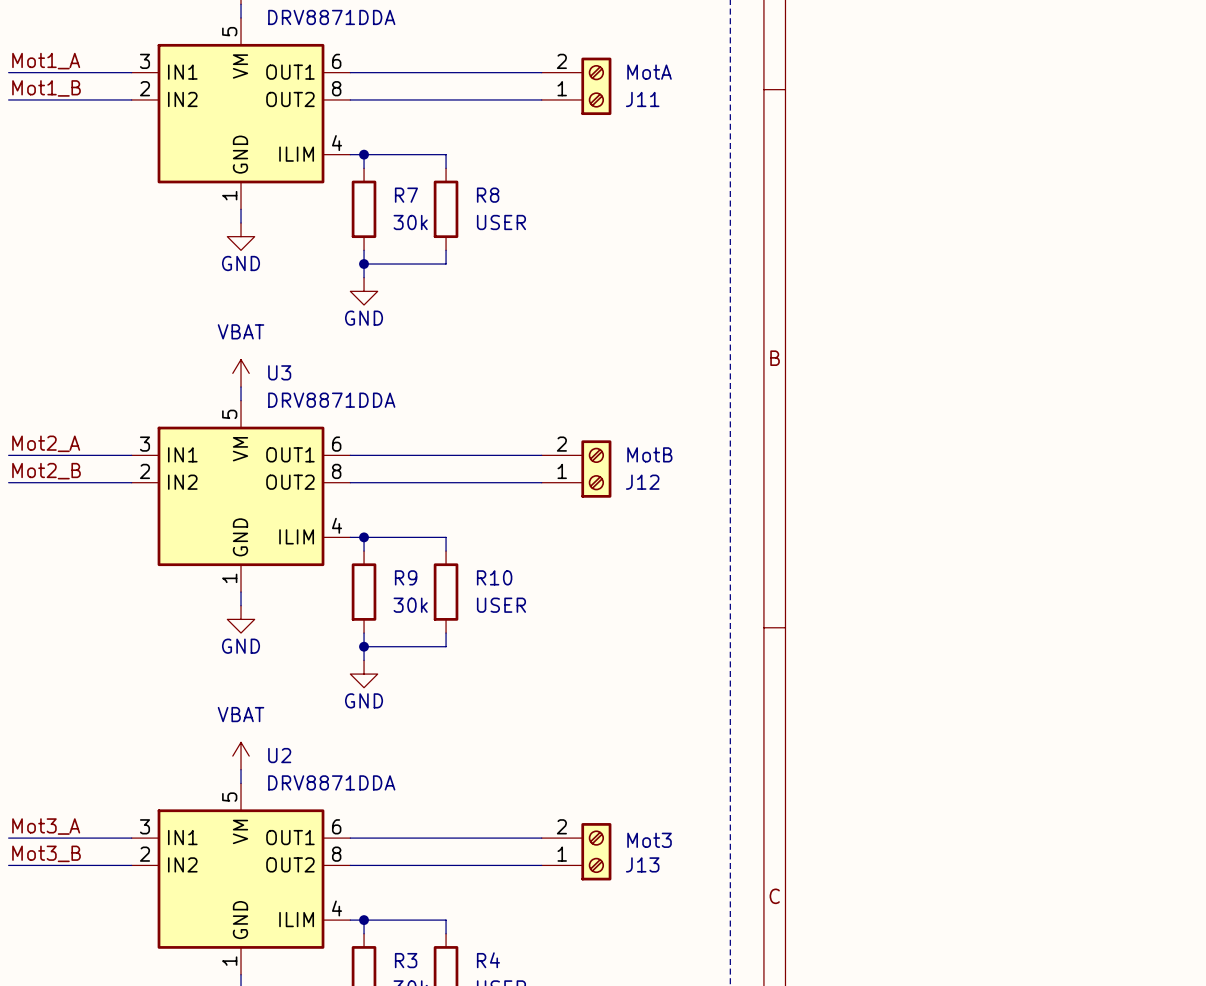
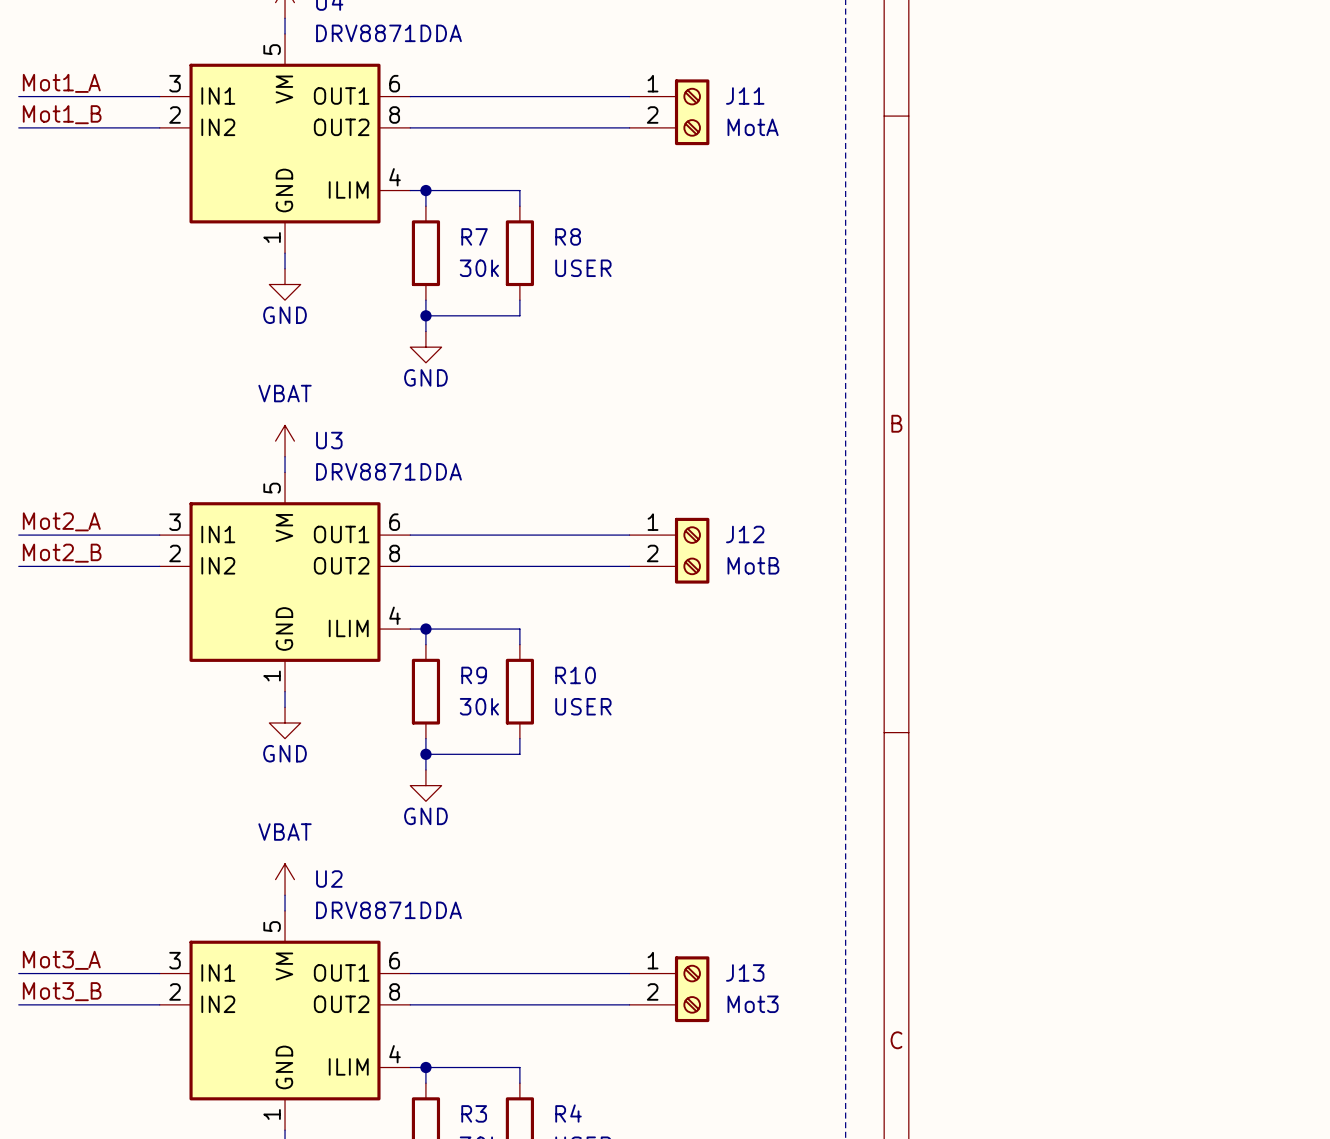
J11 flip: as is (596, 86) -> up-down (692, 112)
J12 flip: as is (596, 469) -> up-down (692, 550)
J13 flip: as is (596, 851) -> up-down (692, 989)

